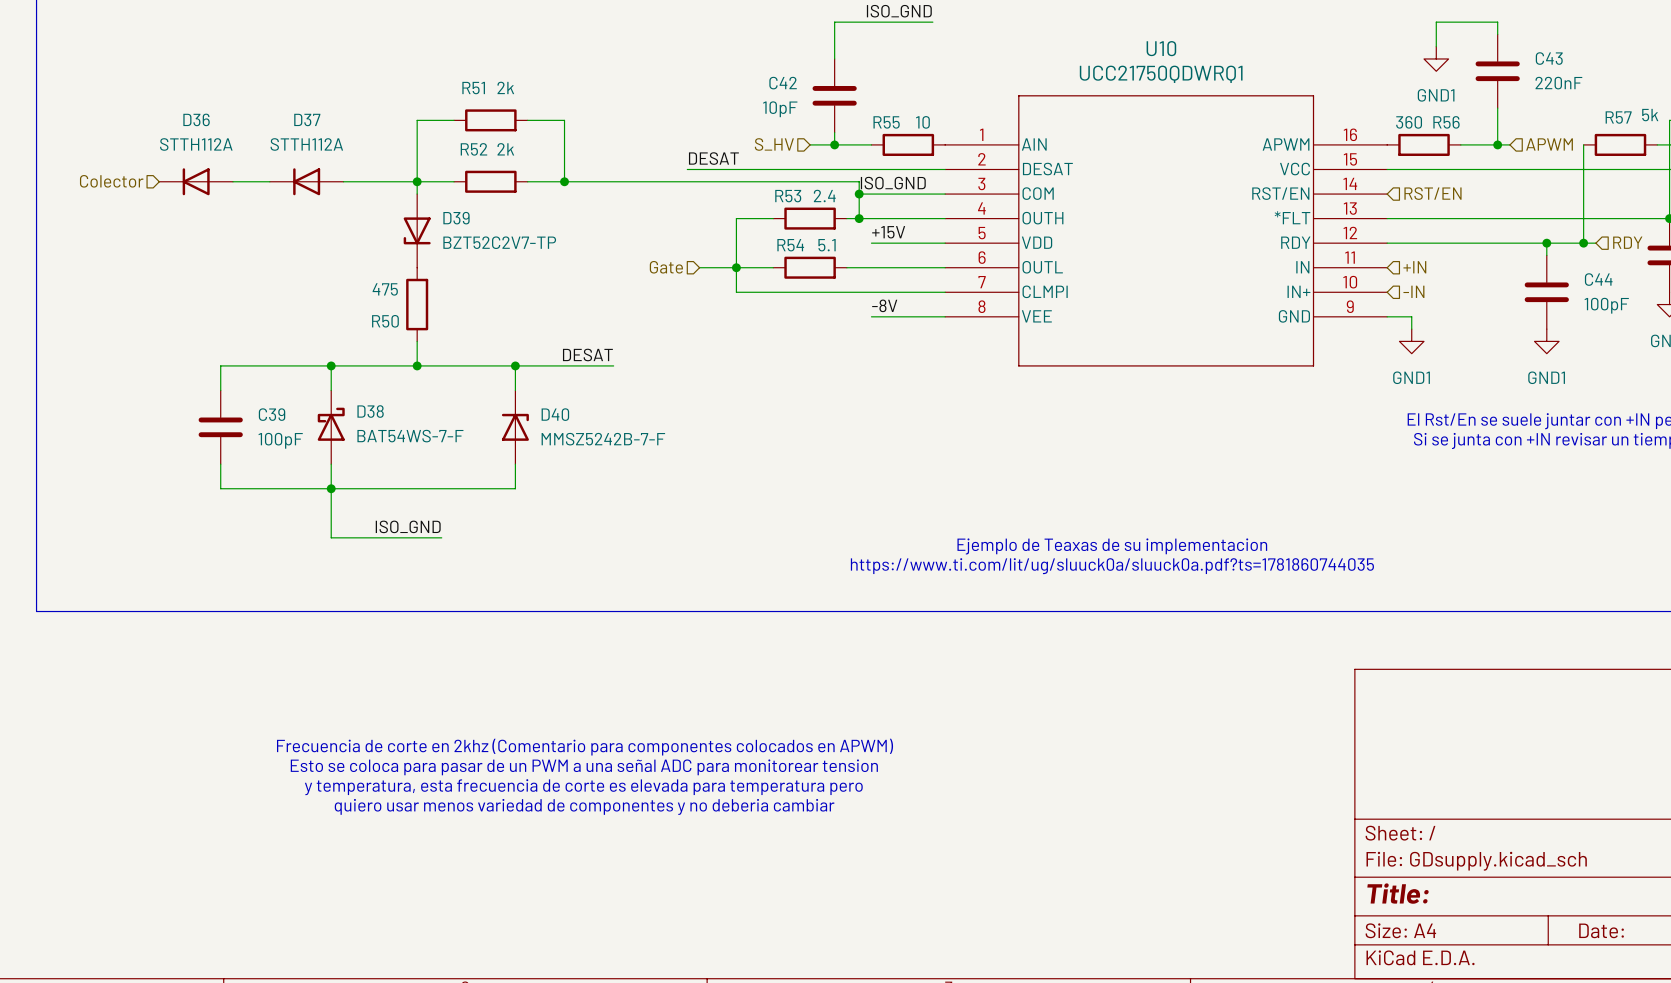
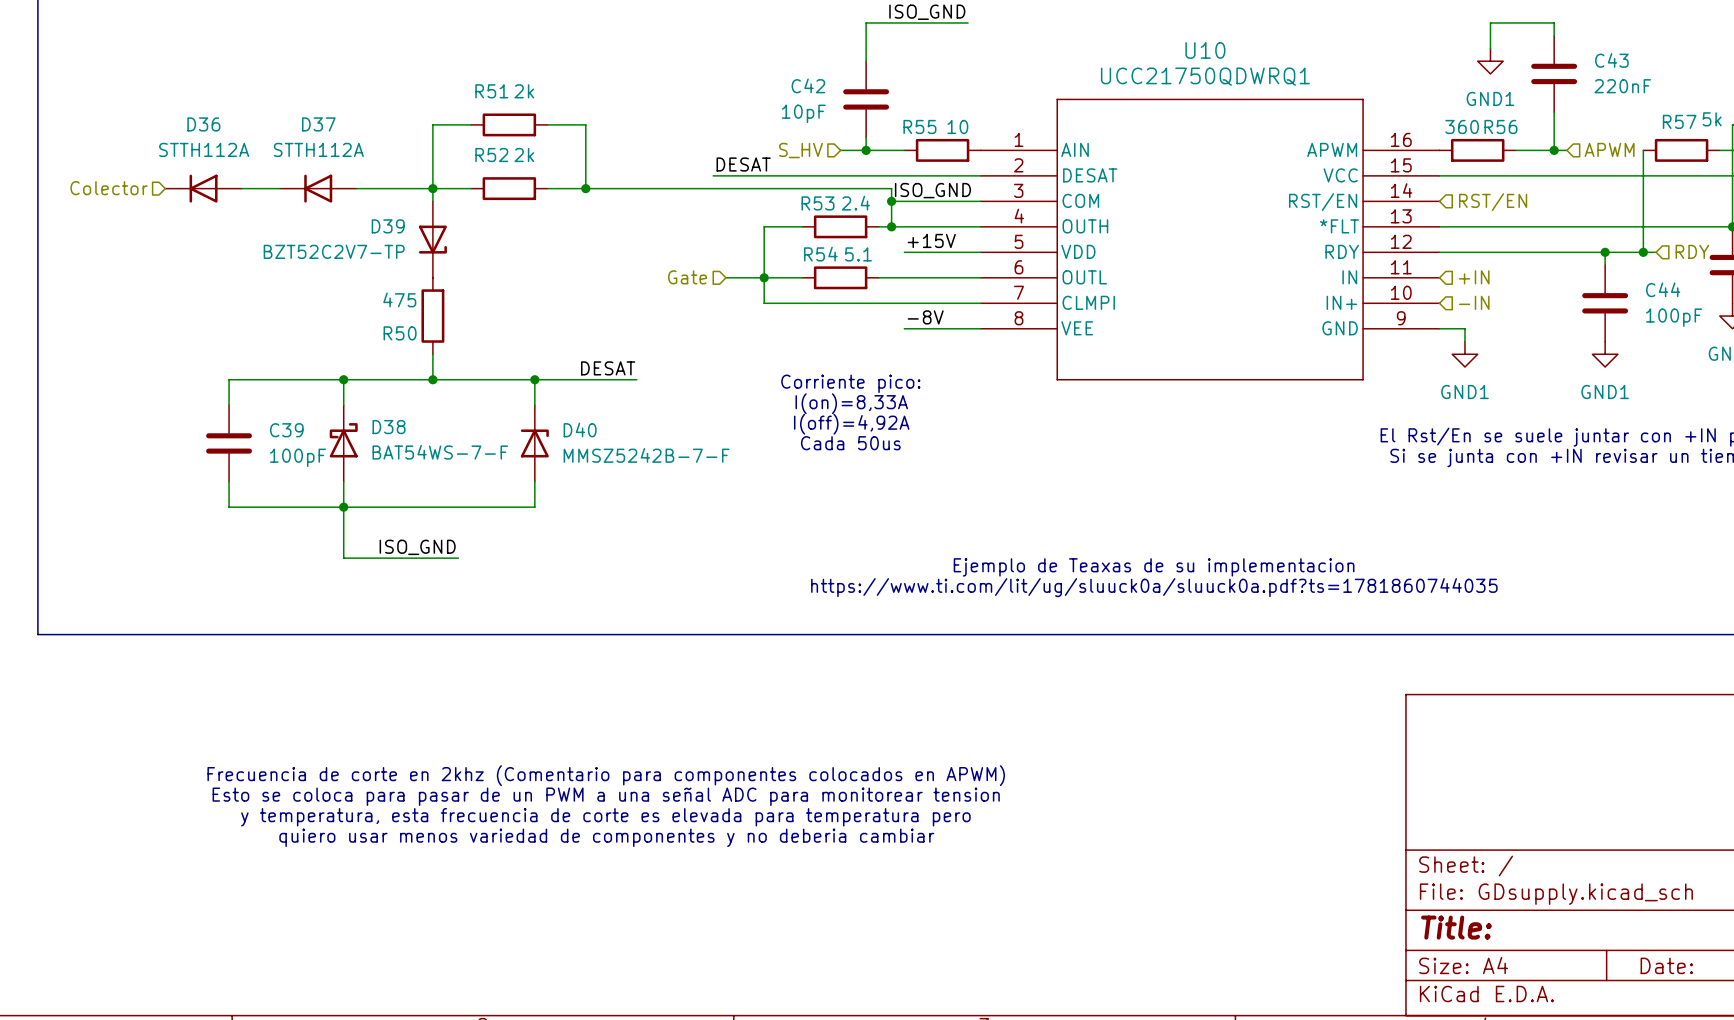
D39 flip: as is (417, 230) -> left-right (432, 239)
text: none -> Corriente pico: (850, 383)
text: none -> I(on)=8,33A (851, 403)
text: none -> I(off)=4,92A (851, 424)
text: none -> Cada 50us (850, 443)

